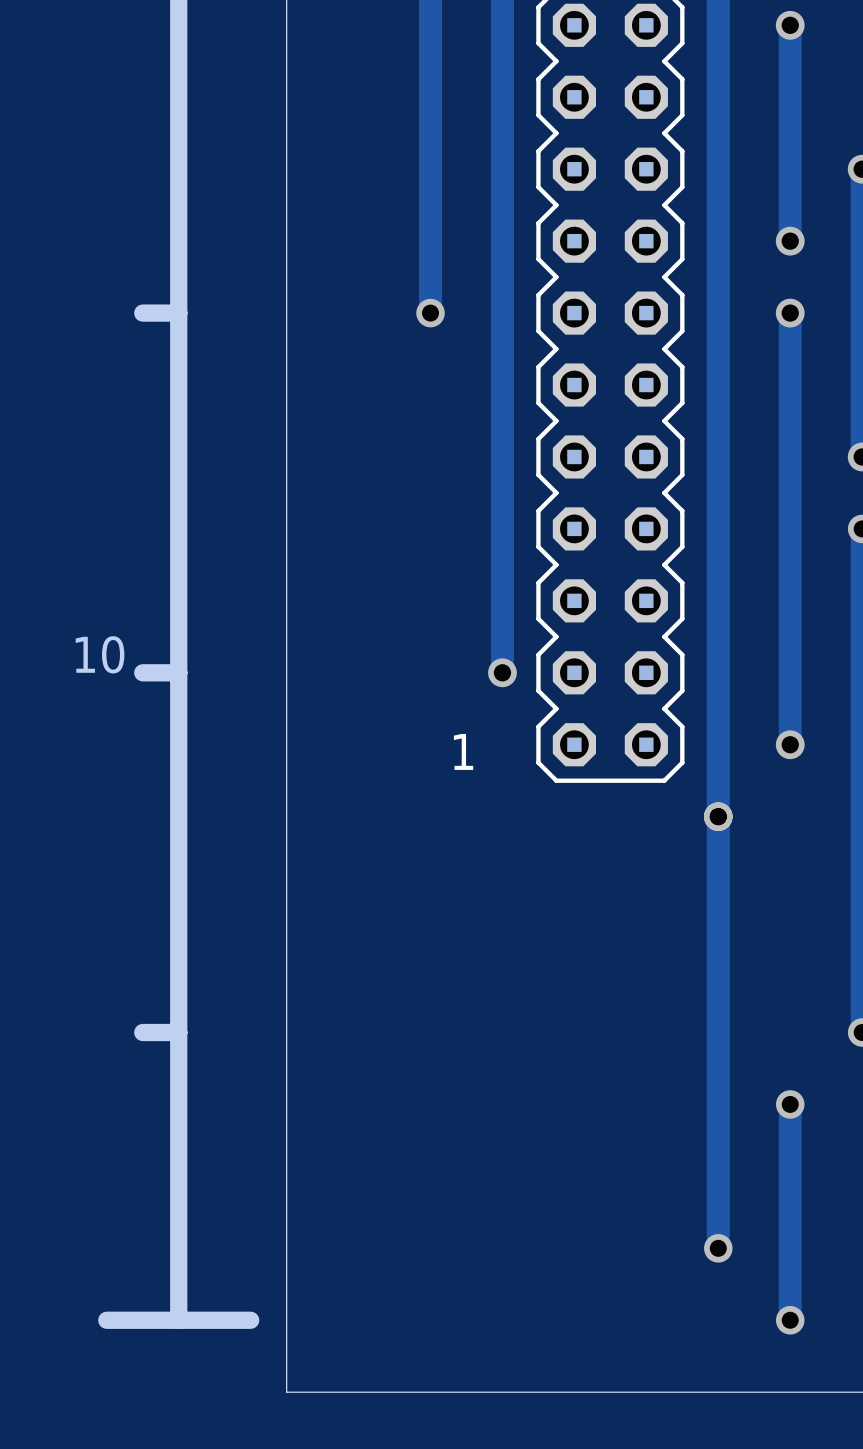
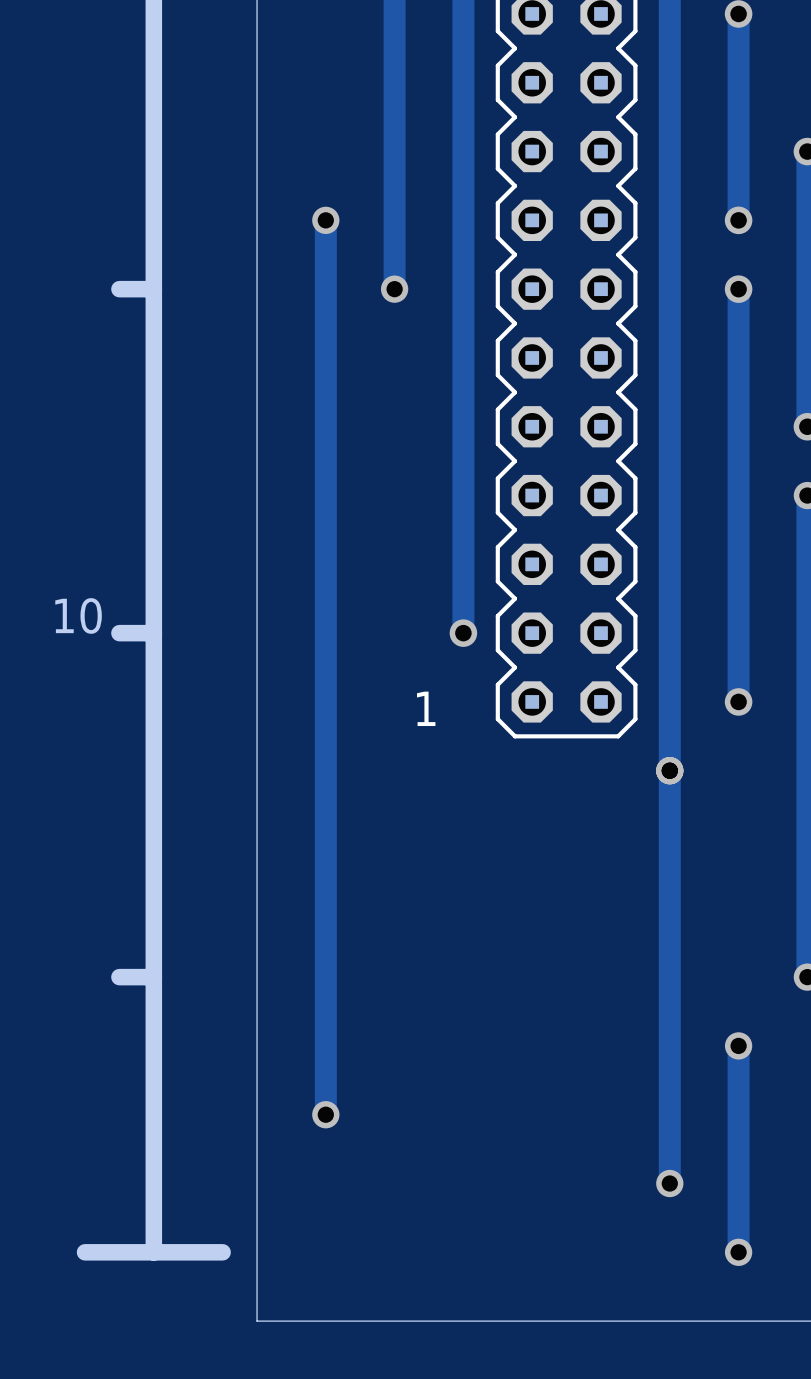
track: none -> (325, 220) (325, 1114)
via: none -> (325, 220)
via: none -> (325, 1114)

